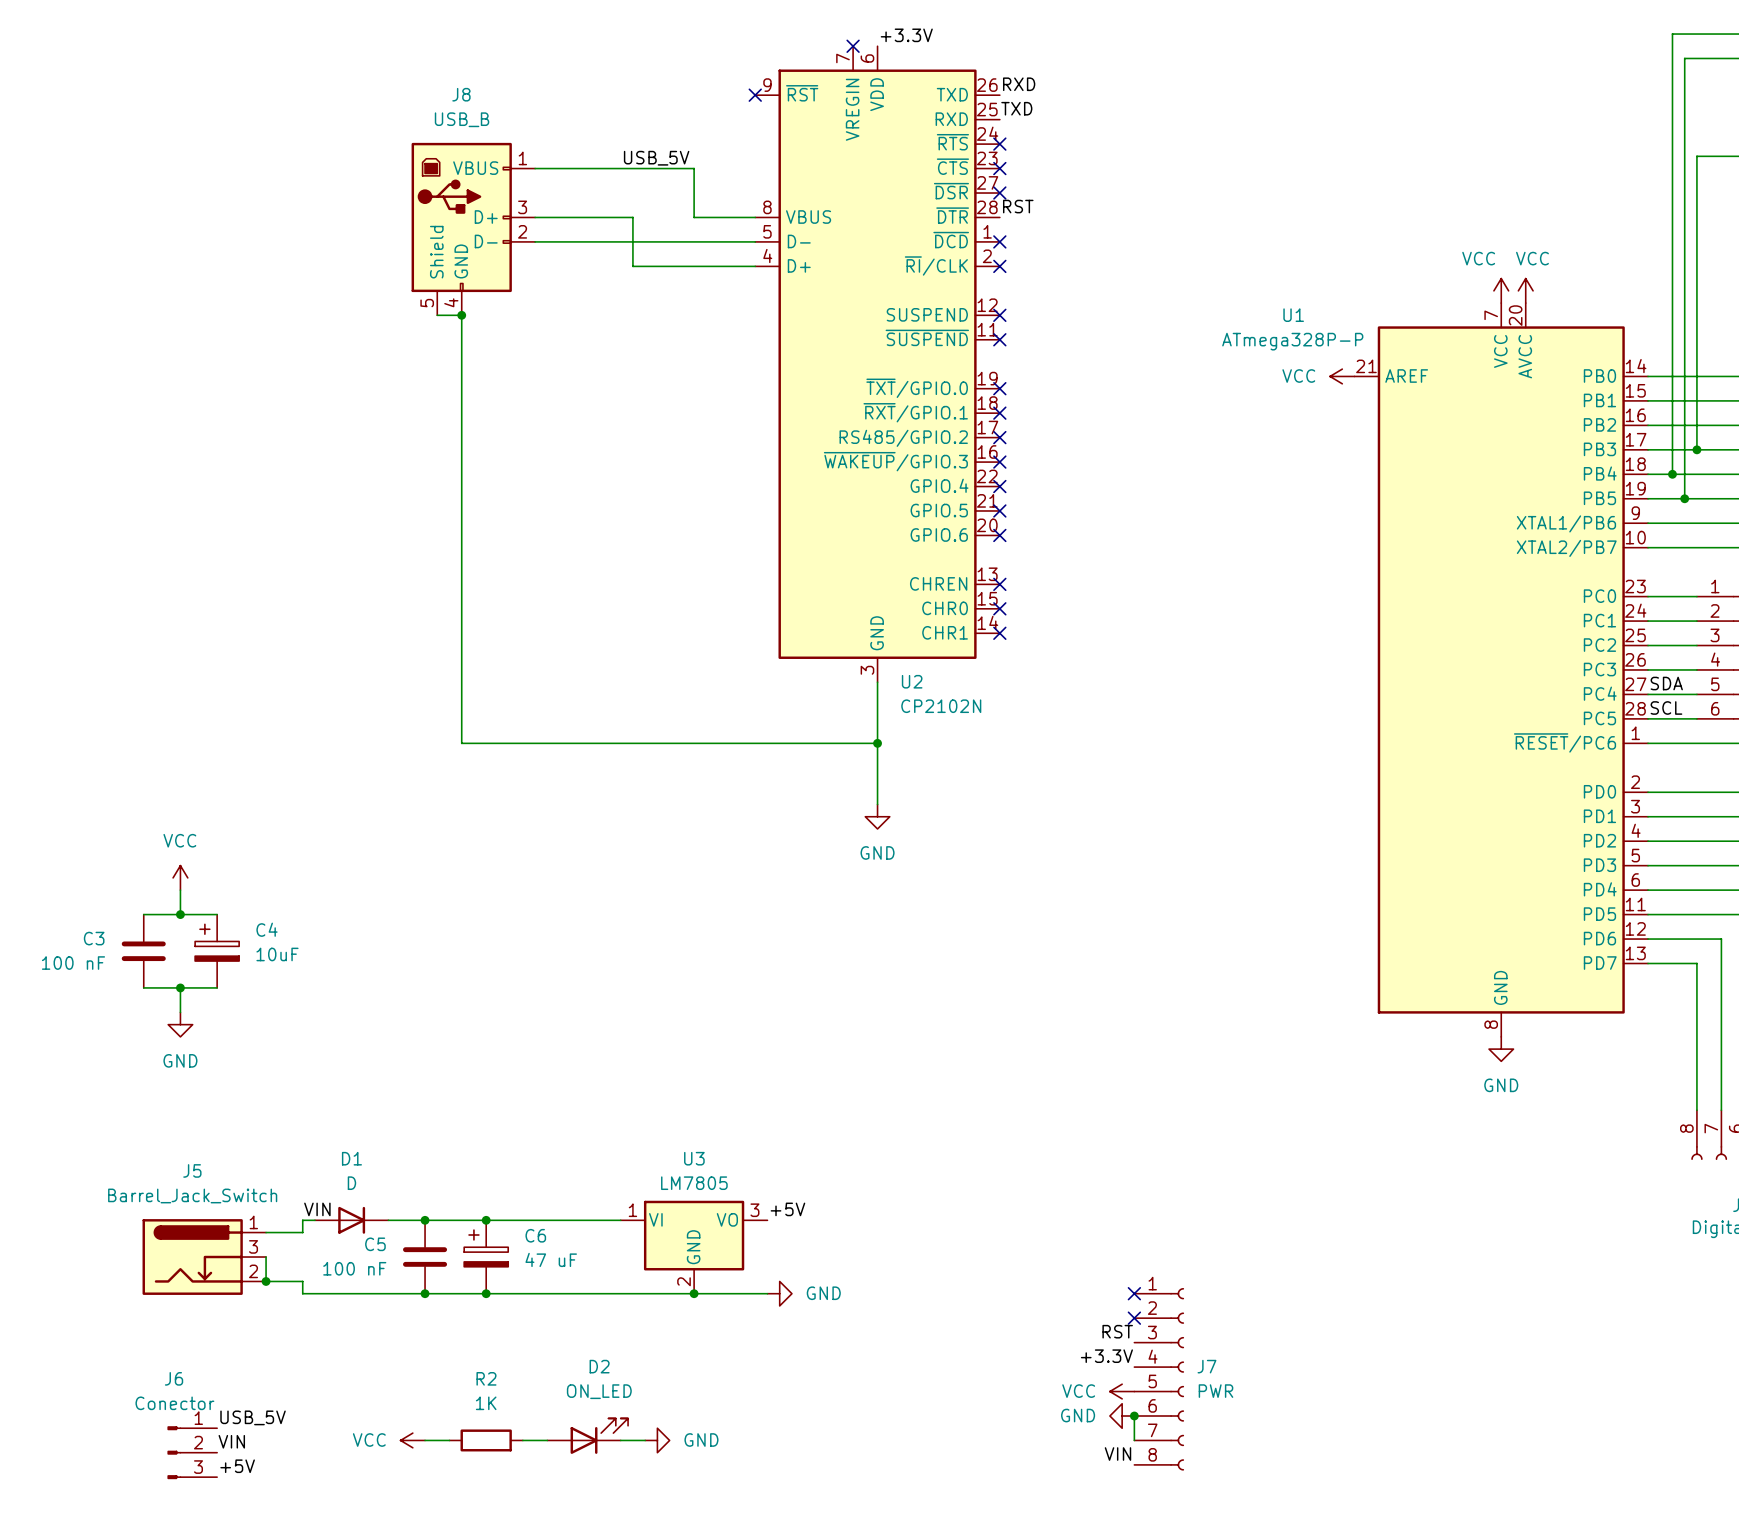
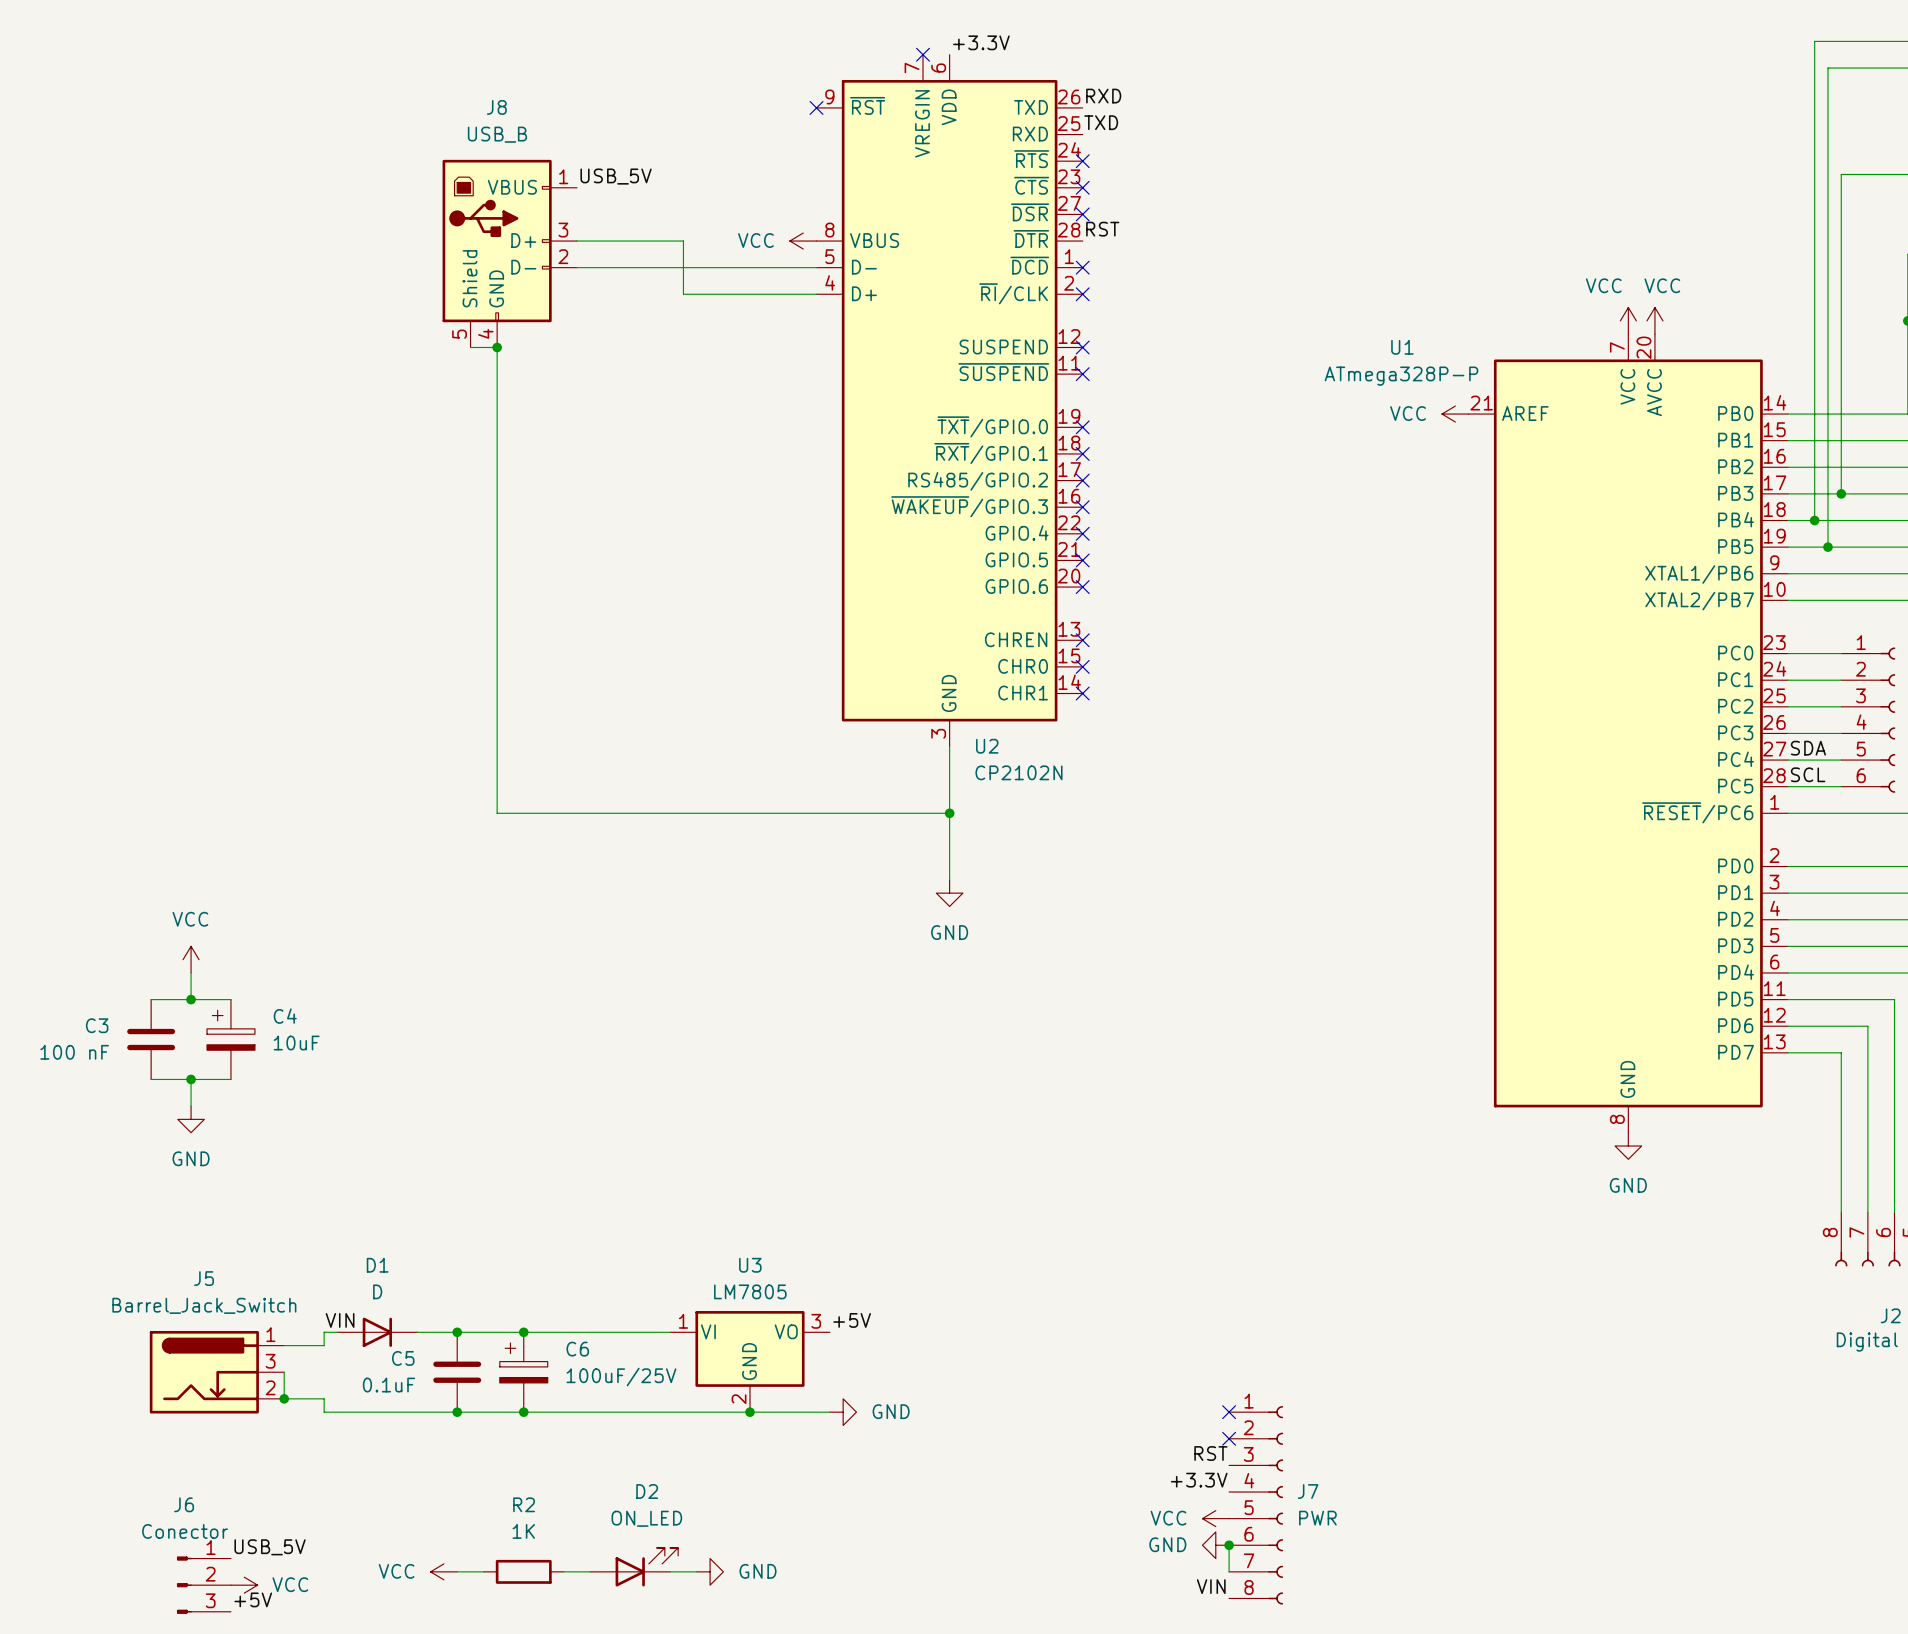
label position: USB_5V (656, 158) -> USB_5V (616, 176)
wire: (535, 168) (694, 168) (694, 217) (755, 217) -> none
power symbol: none -> VCC (803, 241)
C6 value: 47 uF (551, 1259) -> 100uF/25V (621, 1377)
C5 value: 100 nF (354, 1268) -> 0.1uF (388, 1385)
label: VIN (231, 1441) -> none
power symbol: none -> VCC (244, 1585)

